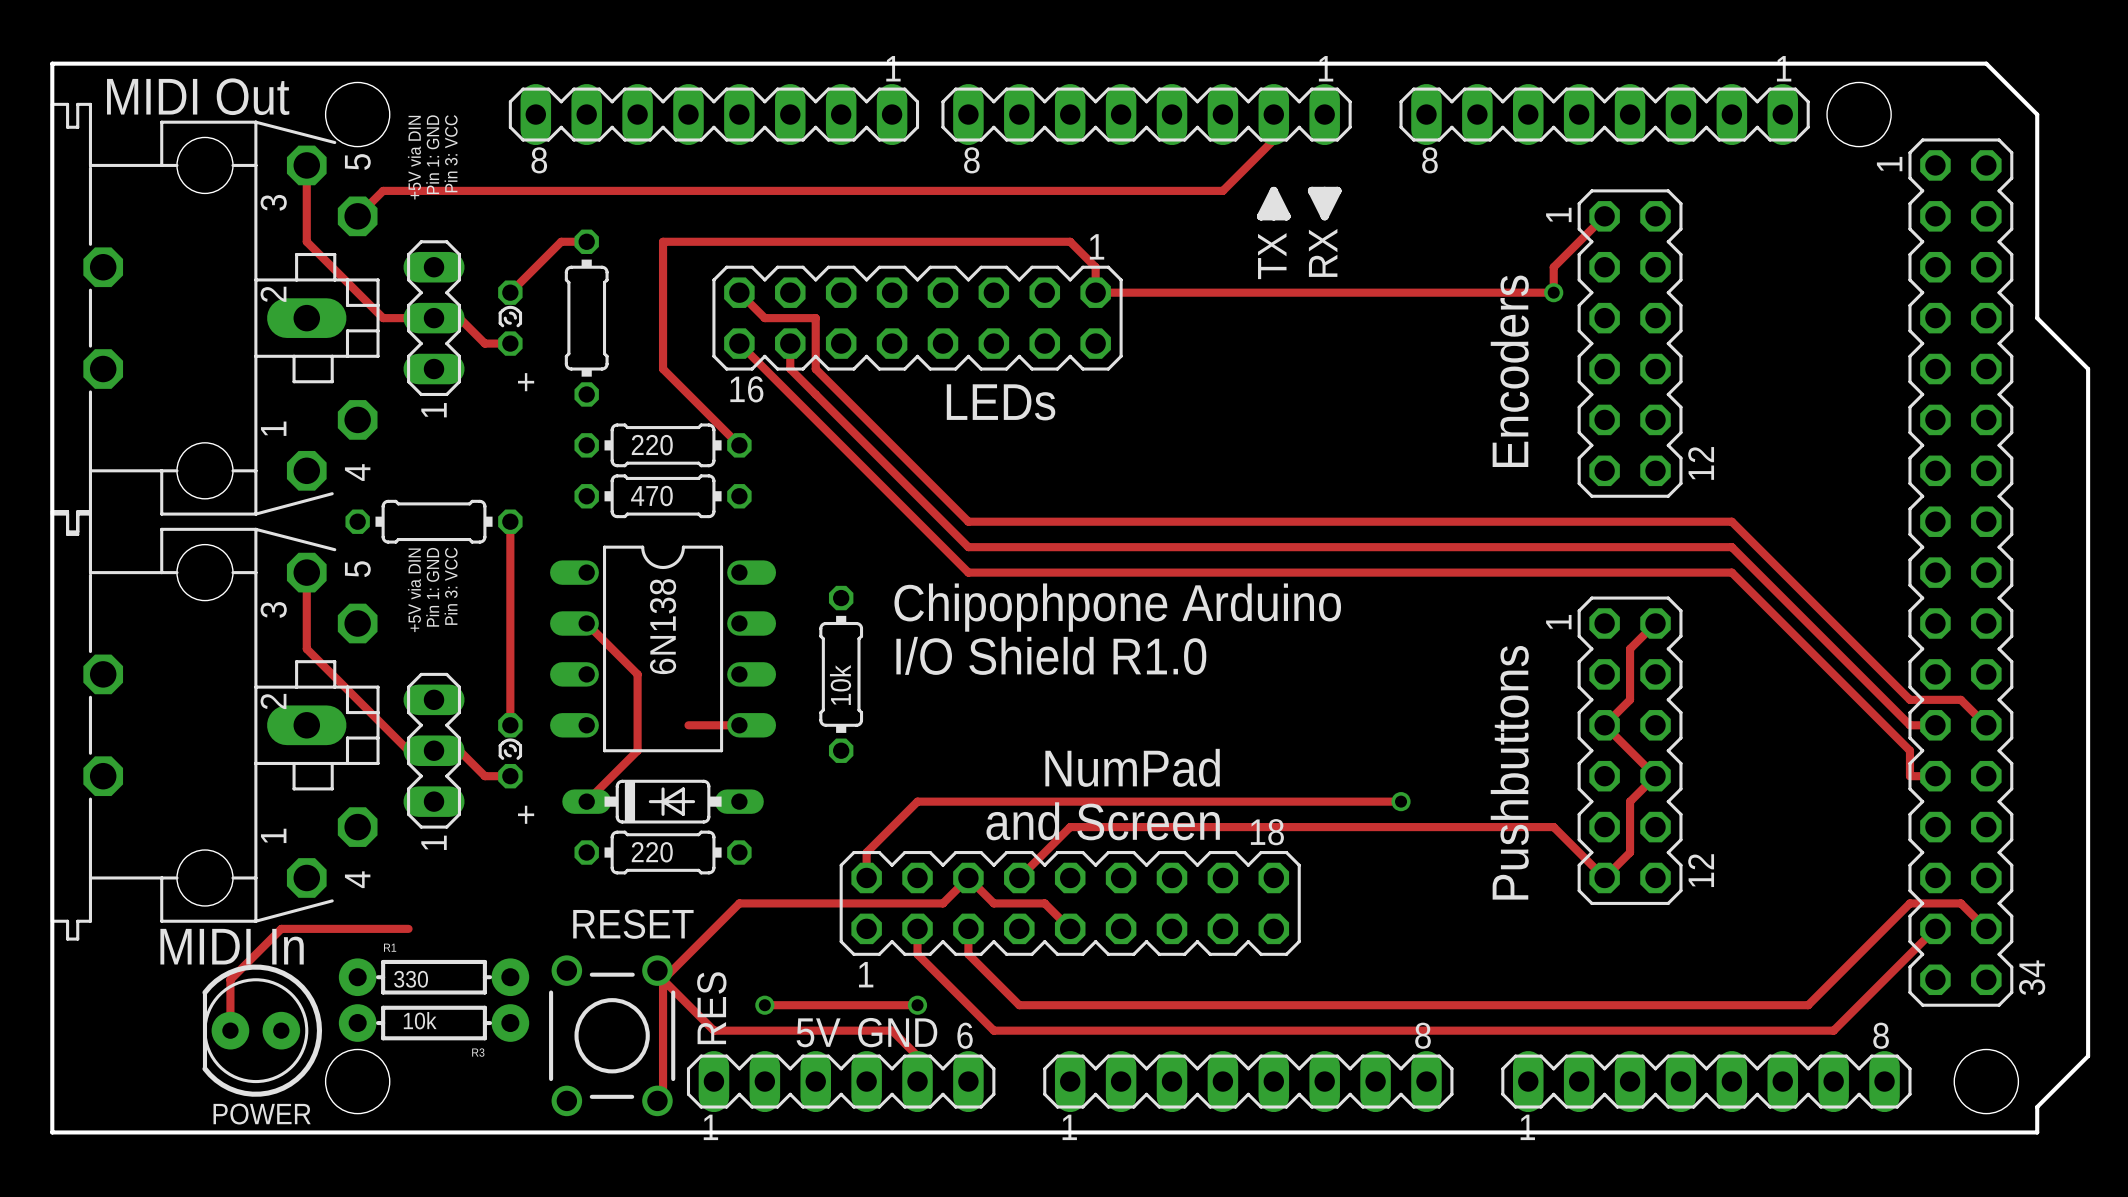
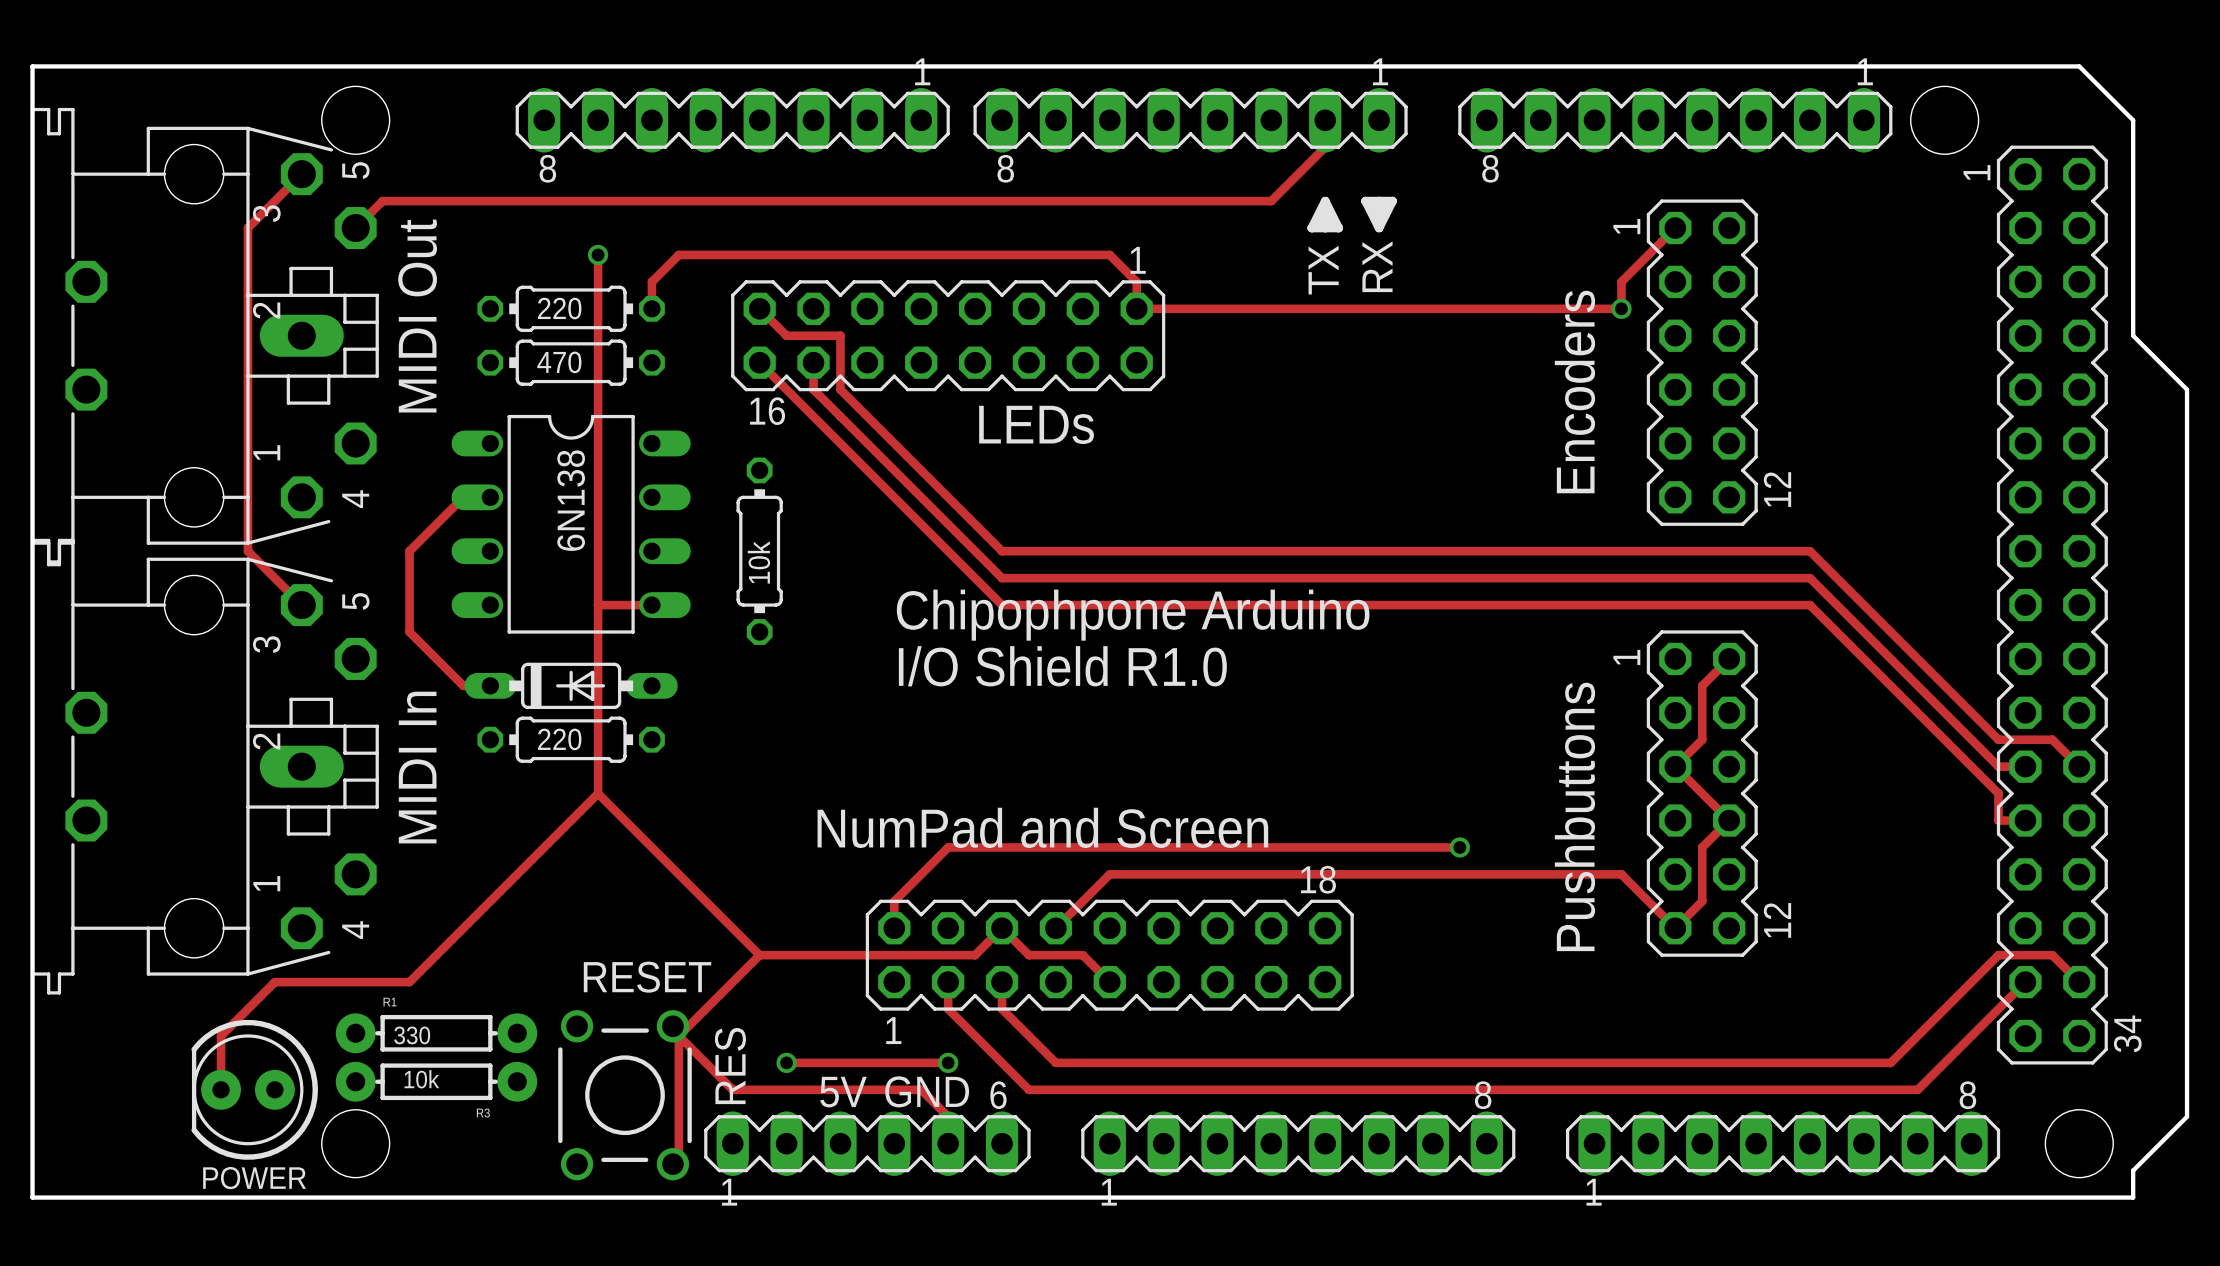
text rotation: 0° (198, 96) -> 90° counterclockwise (417, 316)
text: Pin 3: VCC (451, 153) -> none
text: Pin 1: GND (432, 154) -> none
text: +5V via DIN (414, 157) -> none
track: (306, 165) (306, 241) (383, 318) (459, 318) (484, 343) (510, 343) -> (301, 174) (247, 228) (247, 551) (301, 605)
track: (586, 241) (561, 241) (510, 292) -> (598, 254) (598, 793)
via: none -> (598, 254)
track: (663, 241) (663, 369) (739, 445) -> (678, 254) (651, 281) (651, 308)
part: none -> 220 (571, 308)
part: (434, 318) -> none
part: (510, 318) -> none
part: (586, 318) -> none
text: + (526, 382) -> none
part: 220 (663, 445) -> none
track: none -> (490, 497) (463, 497) (409, 551) (409, 632) (463, 685) (490, 685)
part position: (663, 496) -> (571, 362)
part: (434, 521) -> none
track: (510, 521) (510, 725) -> none
track: (306, 572) (306, 648) (408, 750) (459, 750) (484, 776) (510, 776) -> none
text: Pin 3: VCC (451, 586) -> none
text: Pin 1: GND (432, 587) -> none
text: +5V via DIN (414, 590) -> none
text position: Chipophpone Arduino (1117, 607) -> Chipophpone Arduino (1133, 615)
track: (586, 623) (637, 674) (637, 750) (586, 801) -> none
part position: (663, 648) -> (571, 524)
text position: I/O Shield R1.0 (1051, 655) -> I/O Shield R1.0 (1062, 666)
part position: (841, 674) -> (759, 551)
part: none -> 220 (571, 739)
track: (688, 725) (739, 725) -> (598, 605) (651, 605)
part: (434, 750) -> none
part: (510, 750) -> none
track: none -> (598, 793) (759, 955)
track: none -> (598, 793) (409, 982)
text: NumPad (1132, 767) -> none
part position: (663, 801) -> (571, 685)
text: + (526, 814) -> none
text: and Screen (1103, 821) -> NumPad and Screen (1042, 827)
part: 220 (663, 852) -> none
text rotation: 0° (232, 946) -> 90° counterclockwise (417, 767)
text position: MIDI In (232, 946) -> MIDI In (417, 767)

